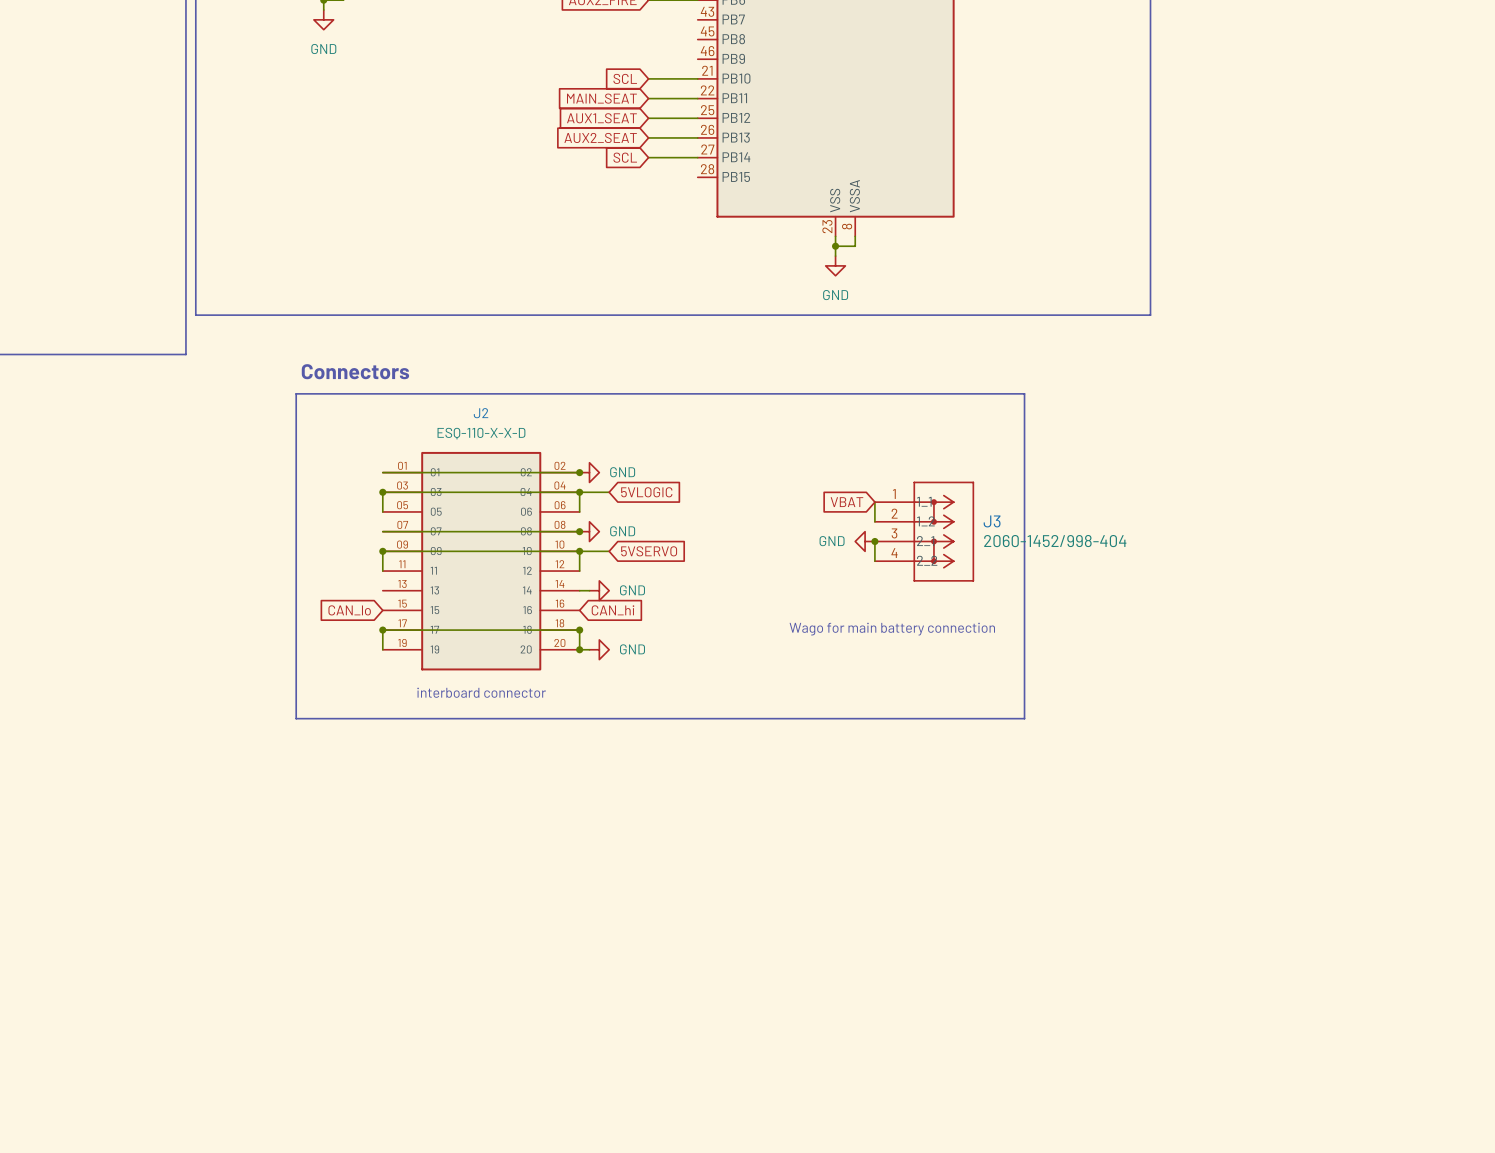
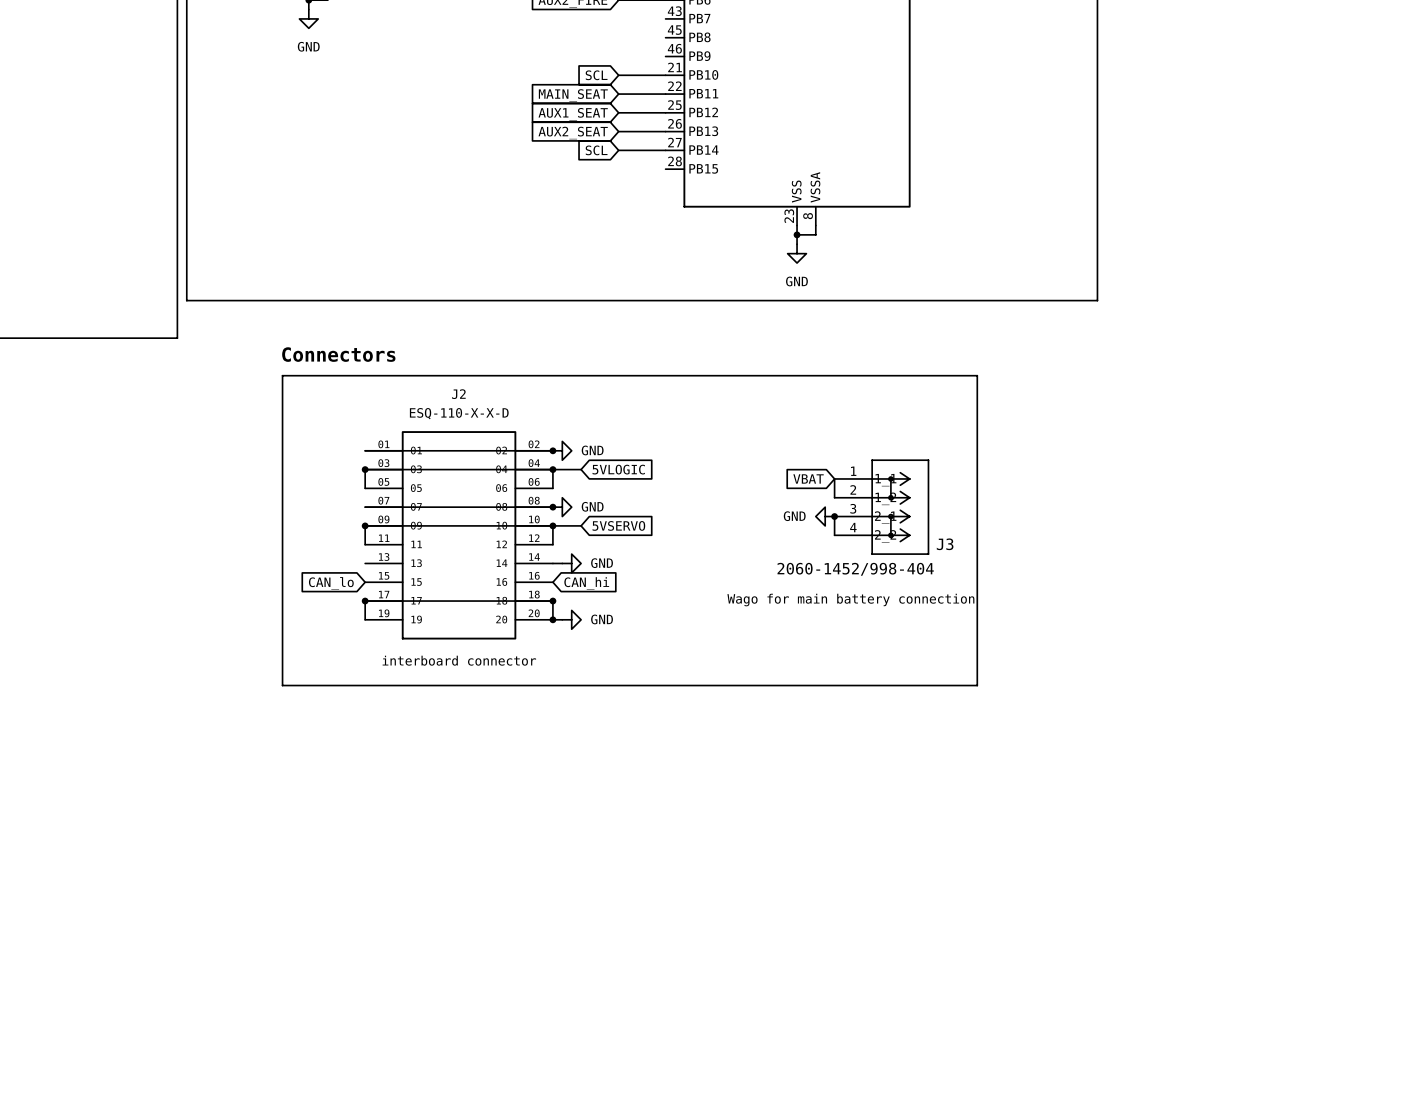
J3 name position: J3 (992, 521) -> J3 (945, 544)
J3 value position: 2060-1452/998-404 (1055, 541) -> 2060-1452/998-404 (855, 569)

